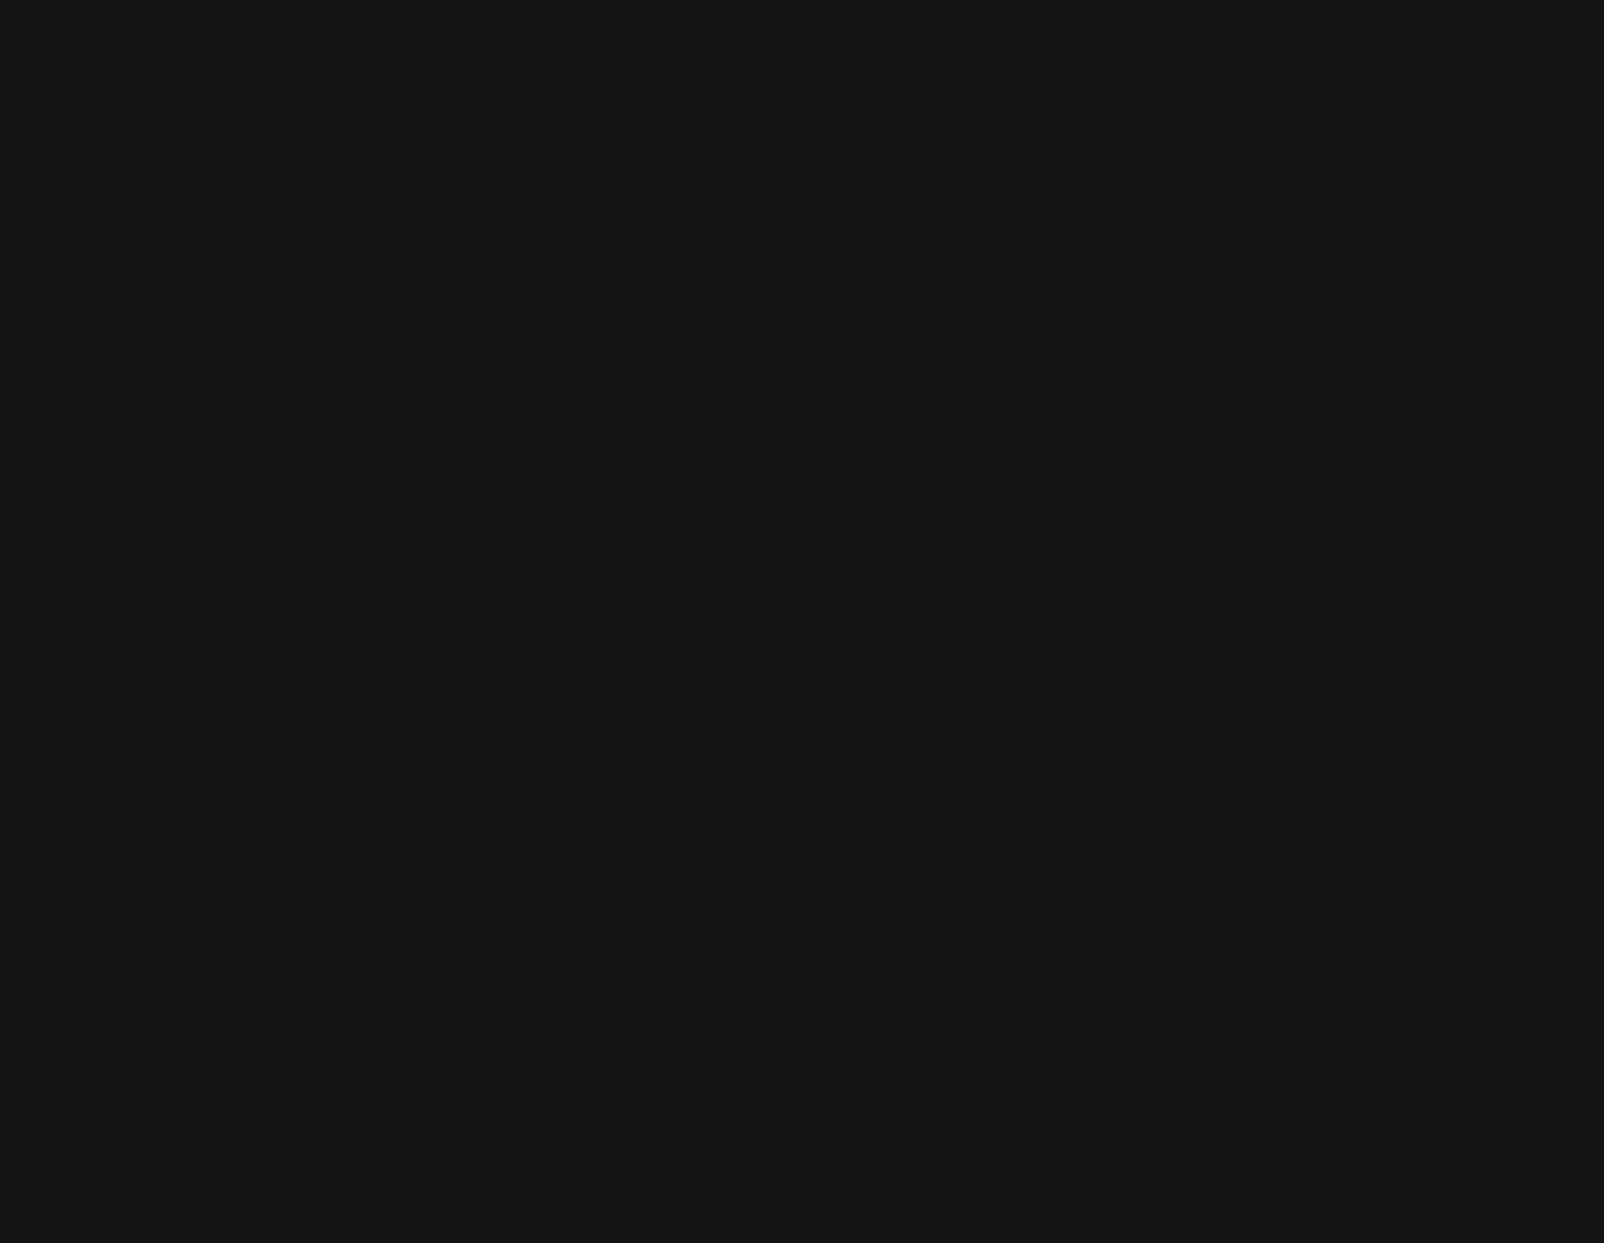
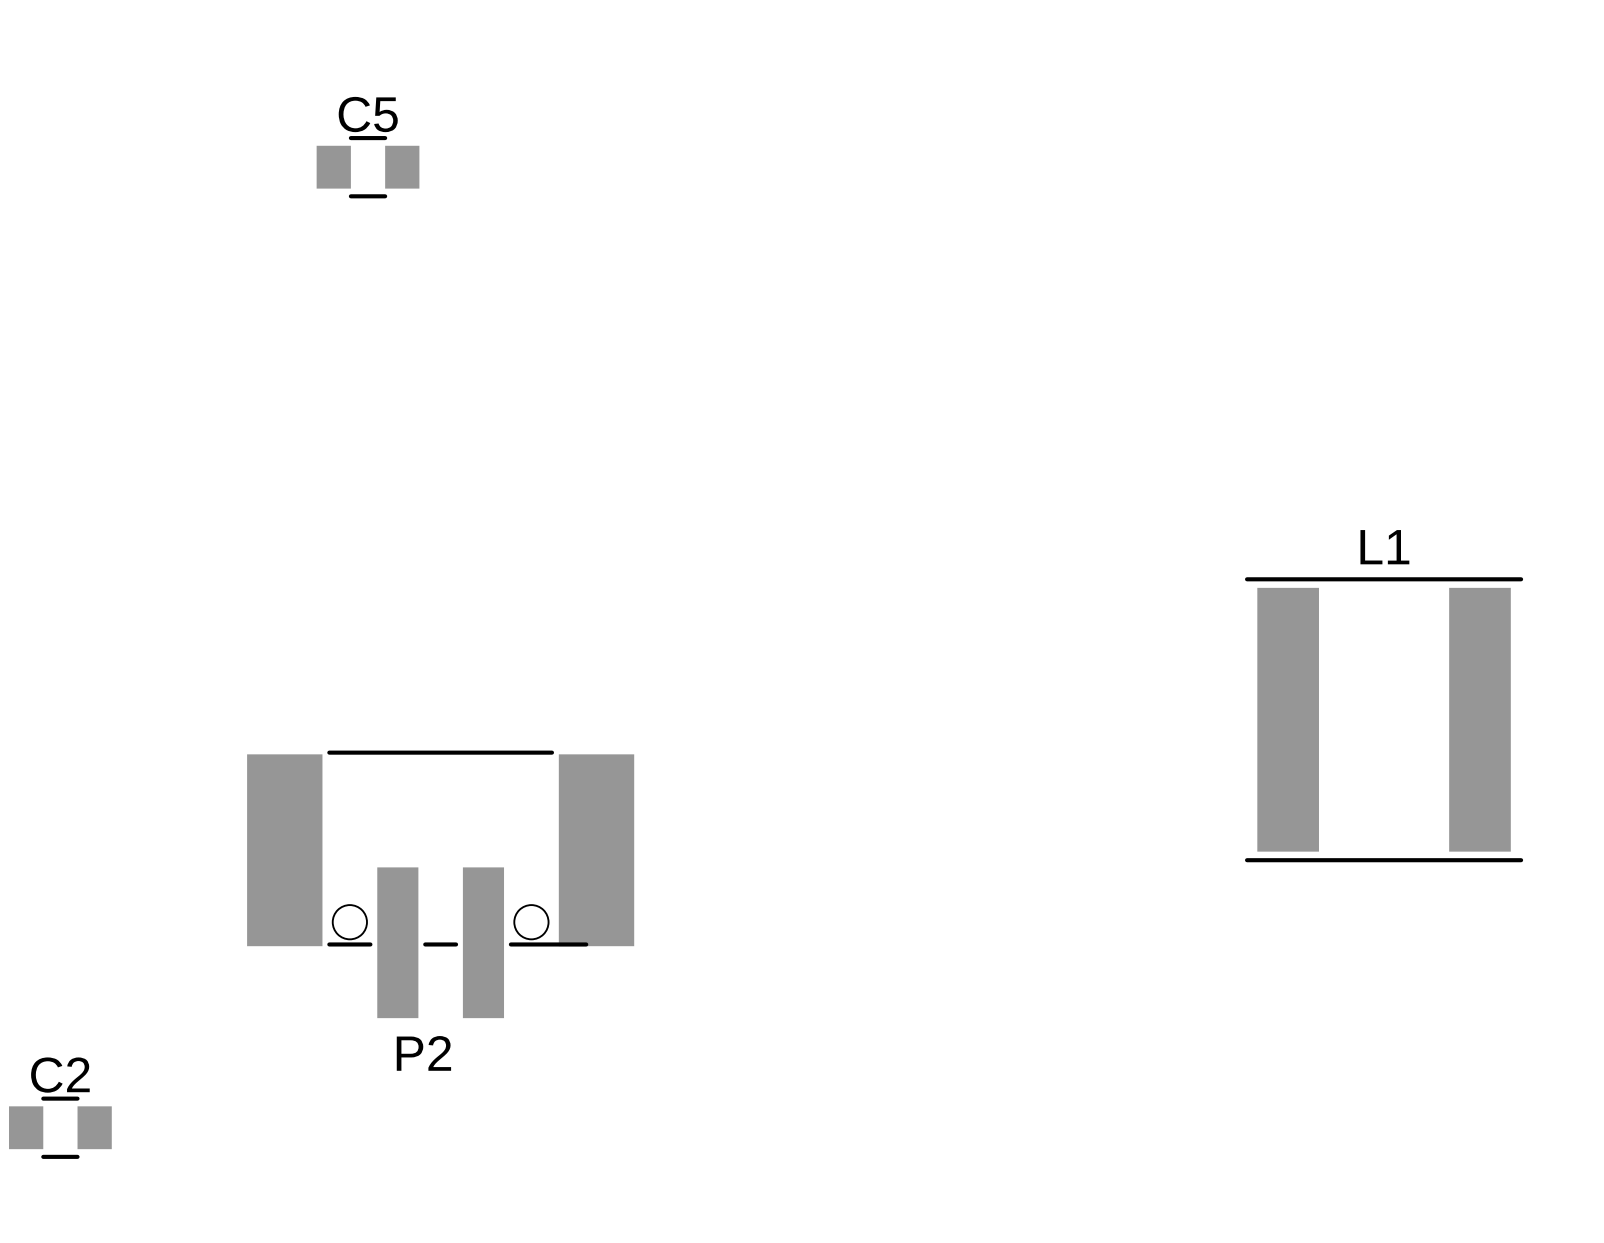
C5: none -> (368, 167)
L1: none -> (1384, 719)
P2: none -> (440, 884)
C2: none -> (60, 1127)

